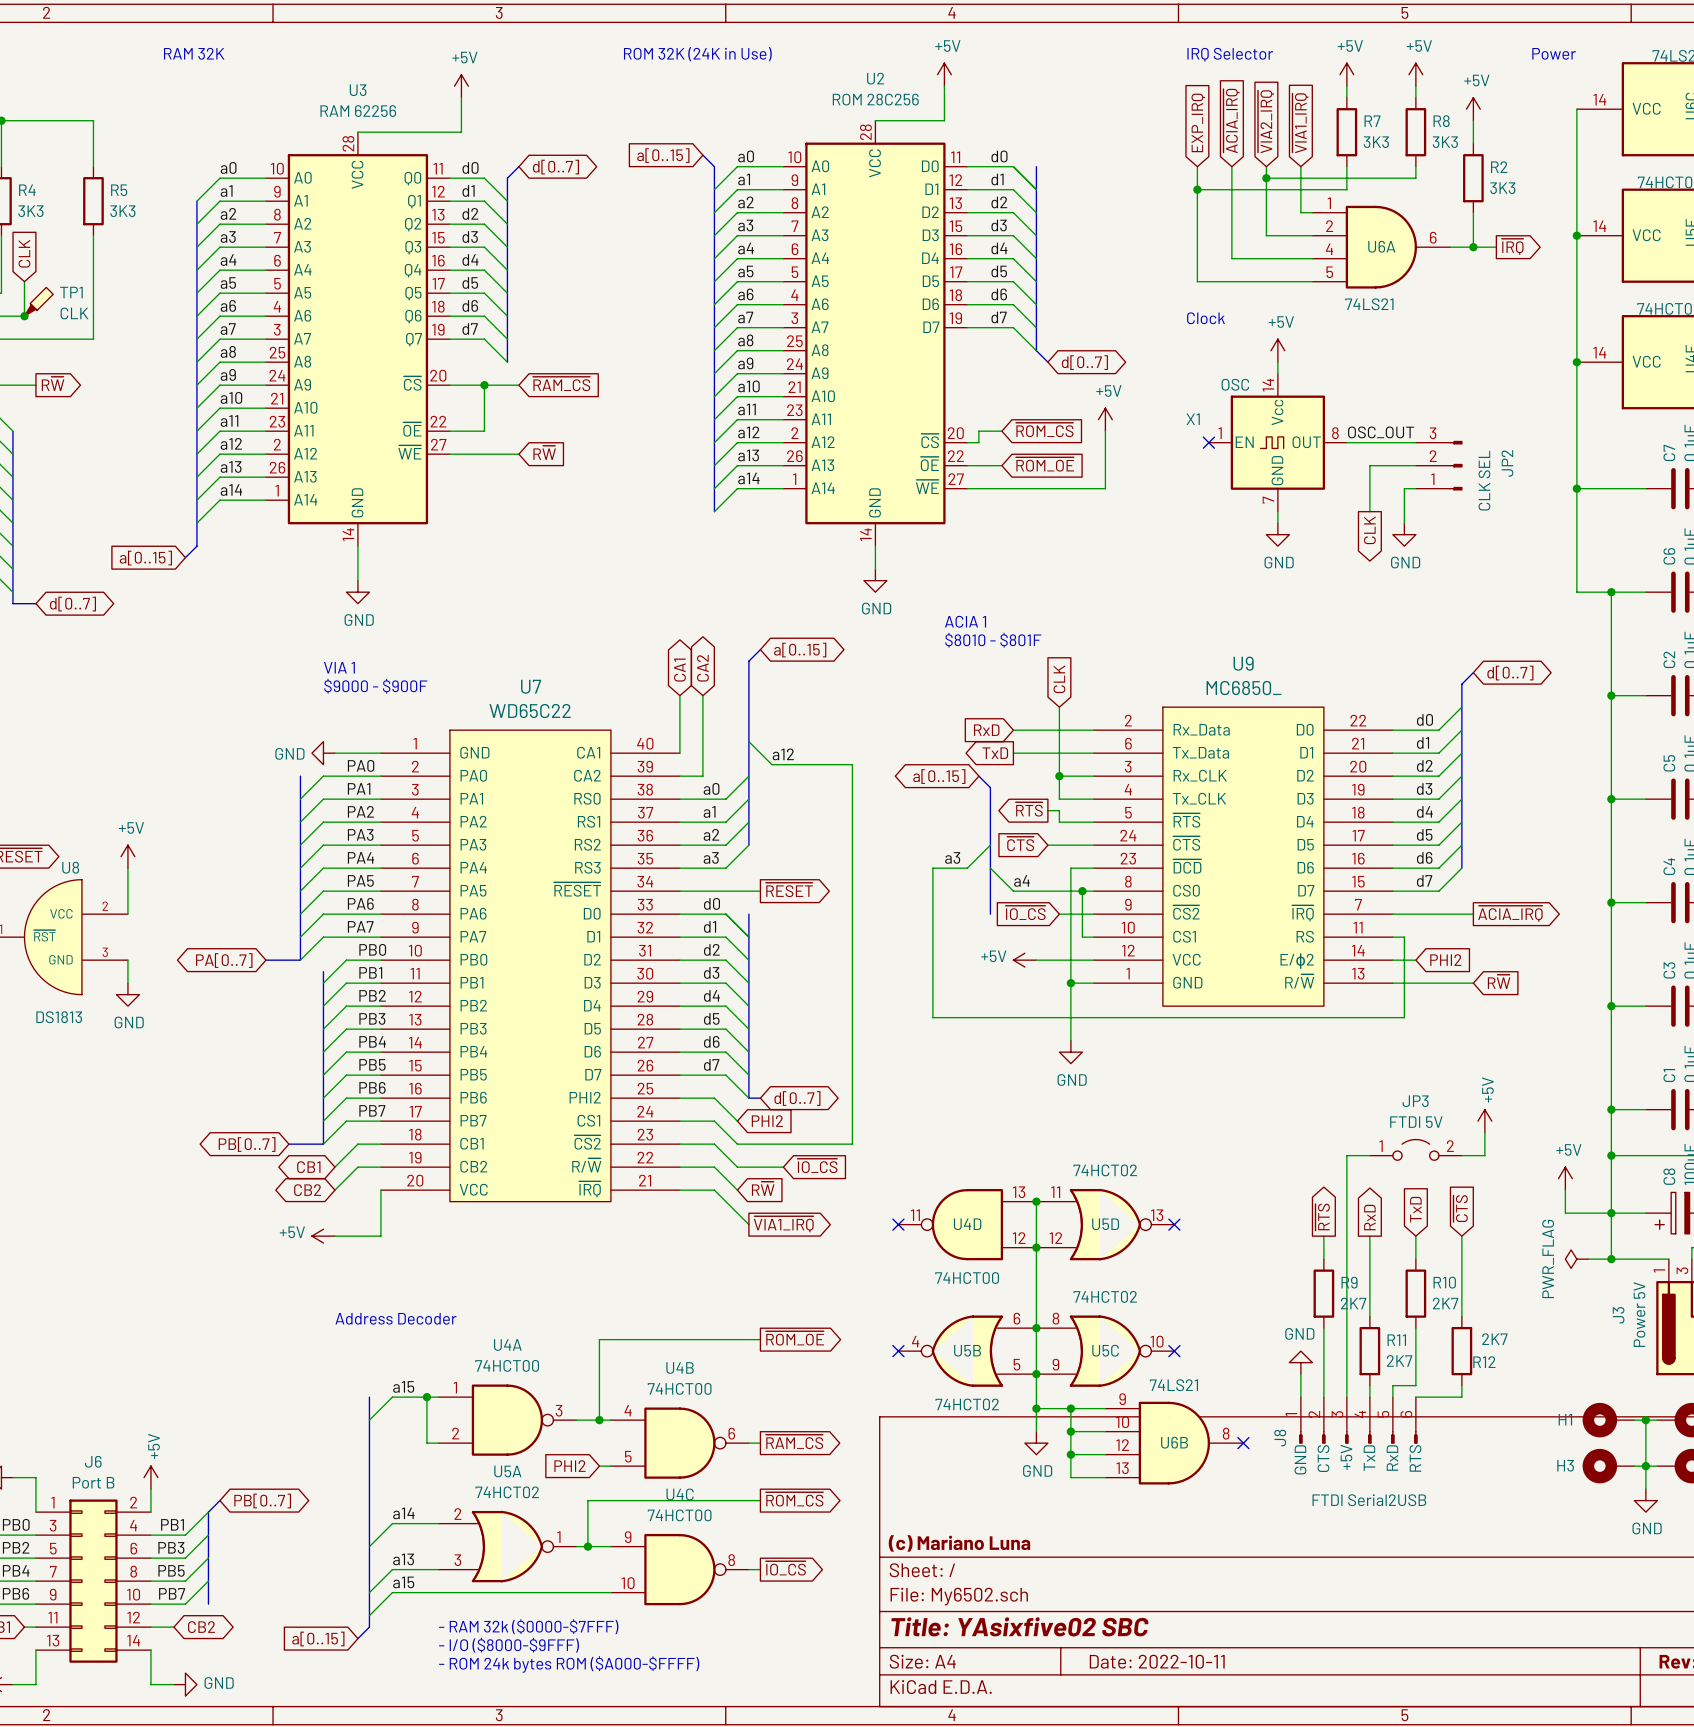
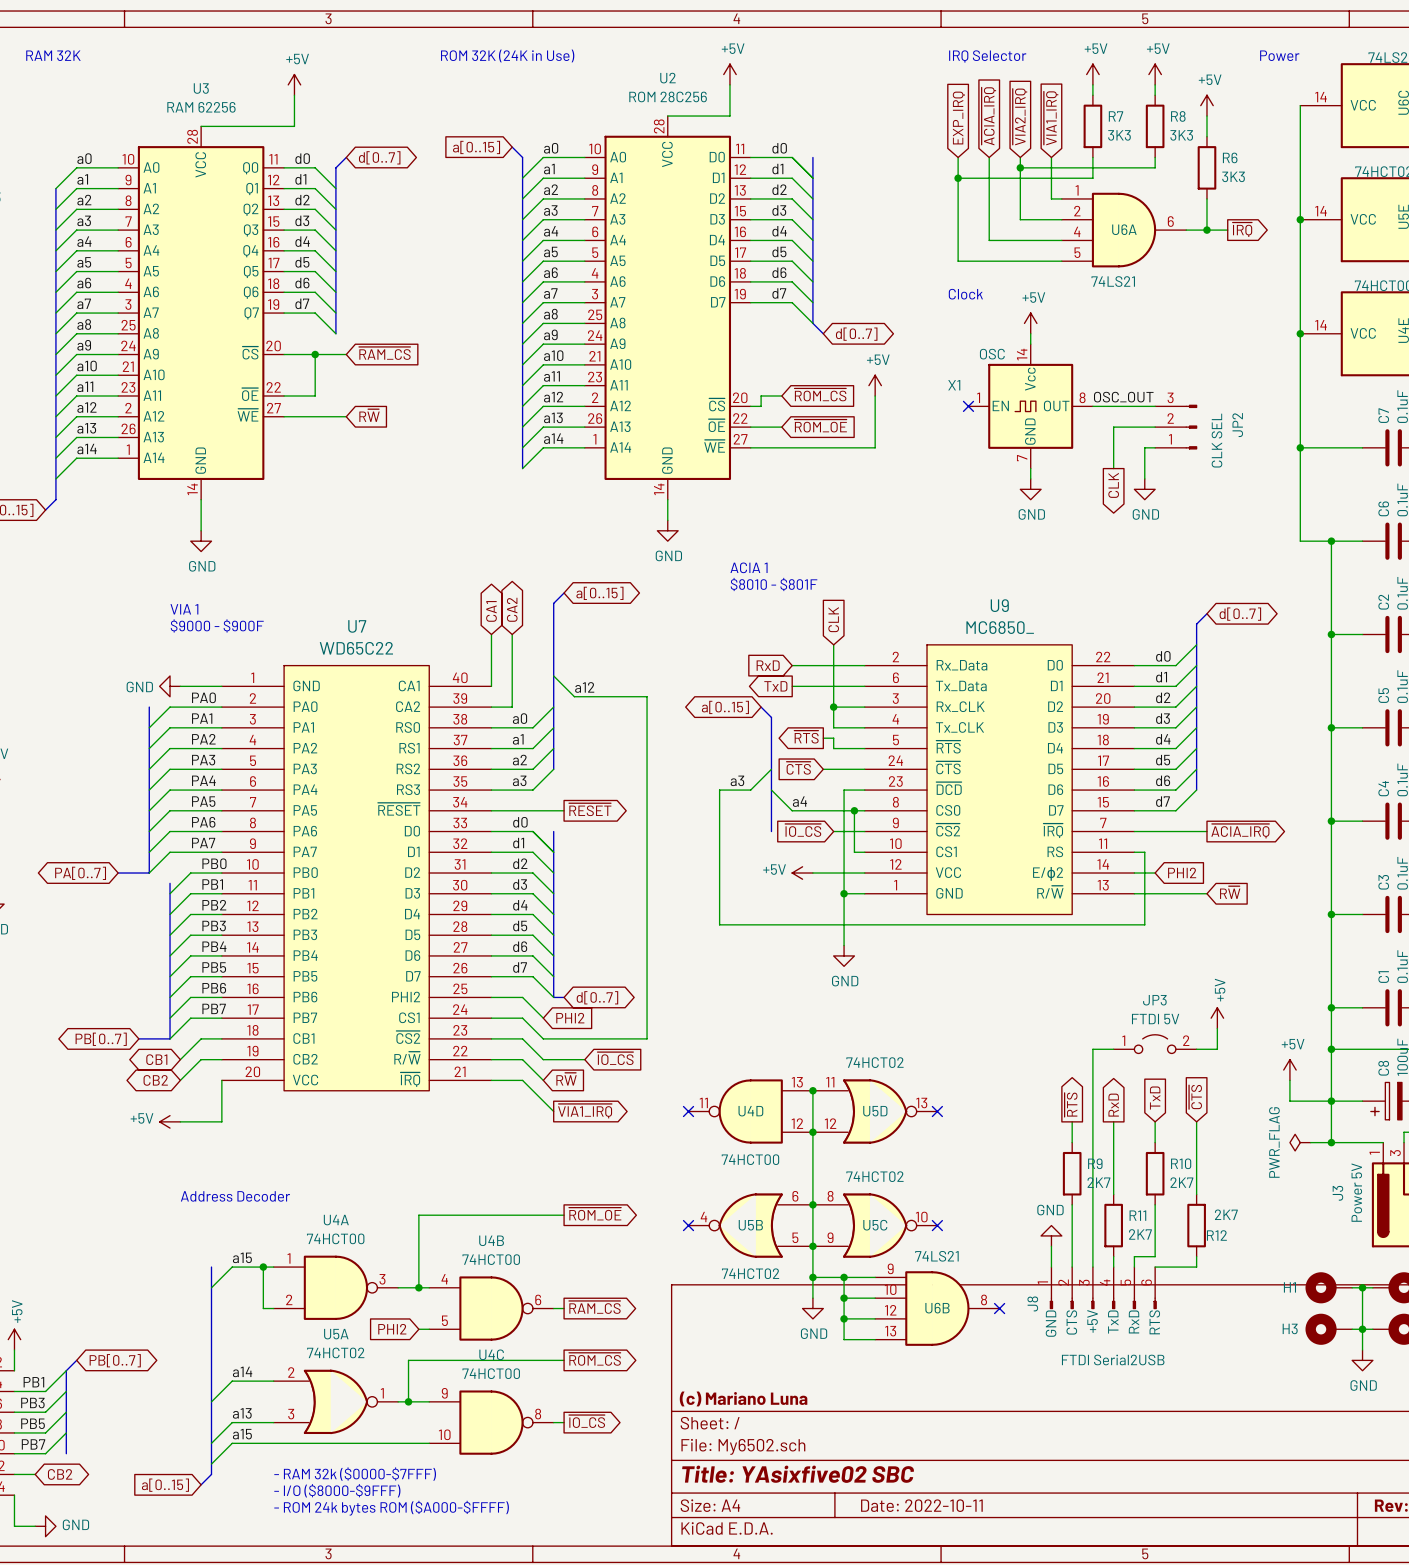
R2 name: R2 (1499, 167) -> R6 (1230, 157)

